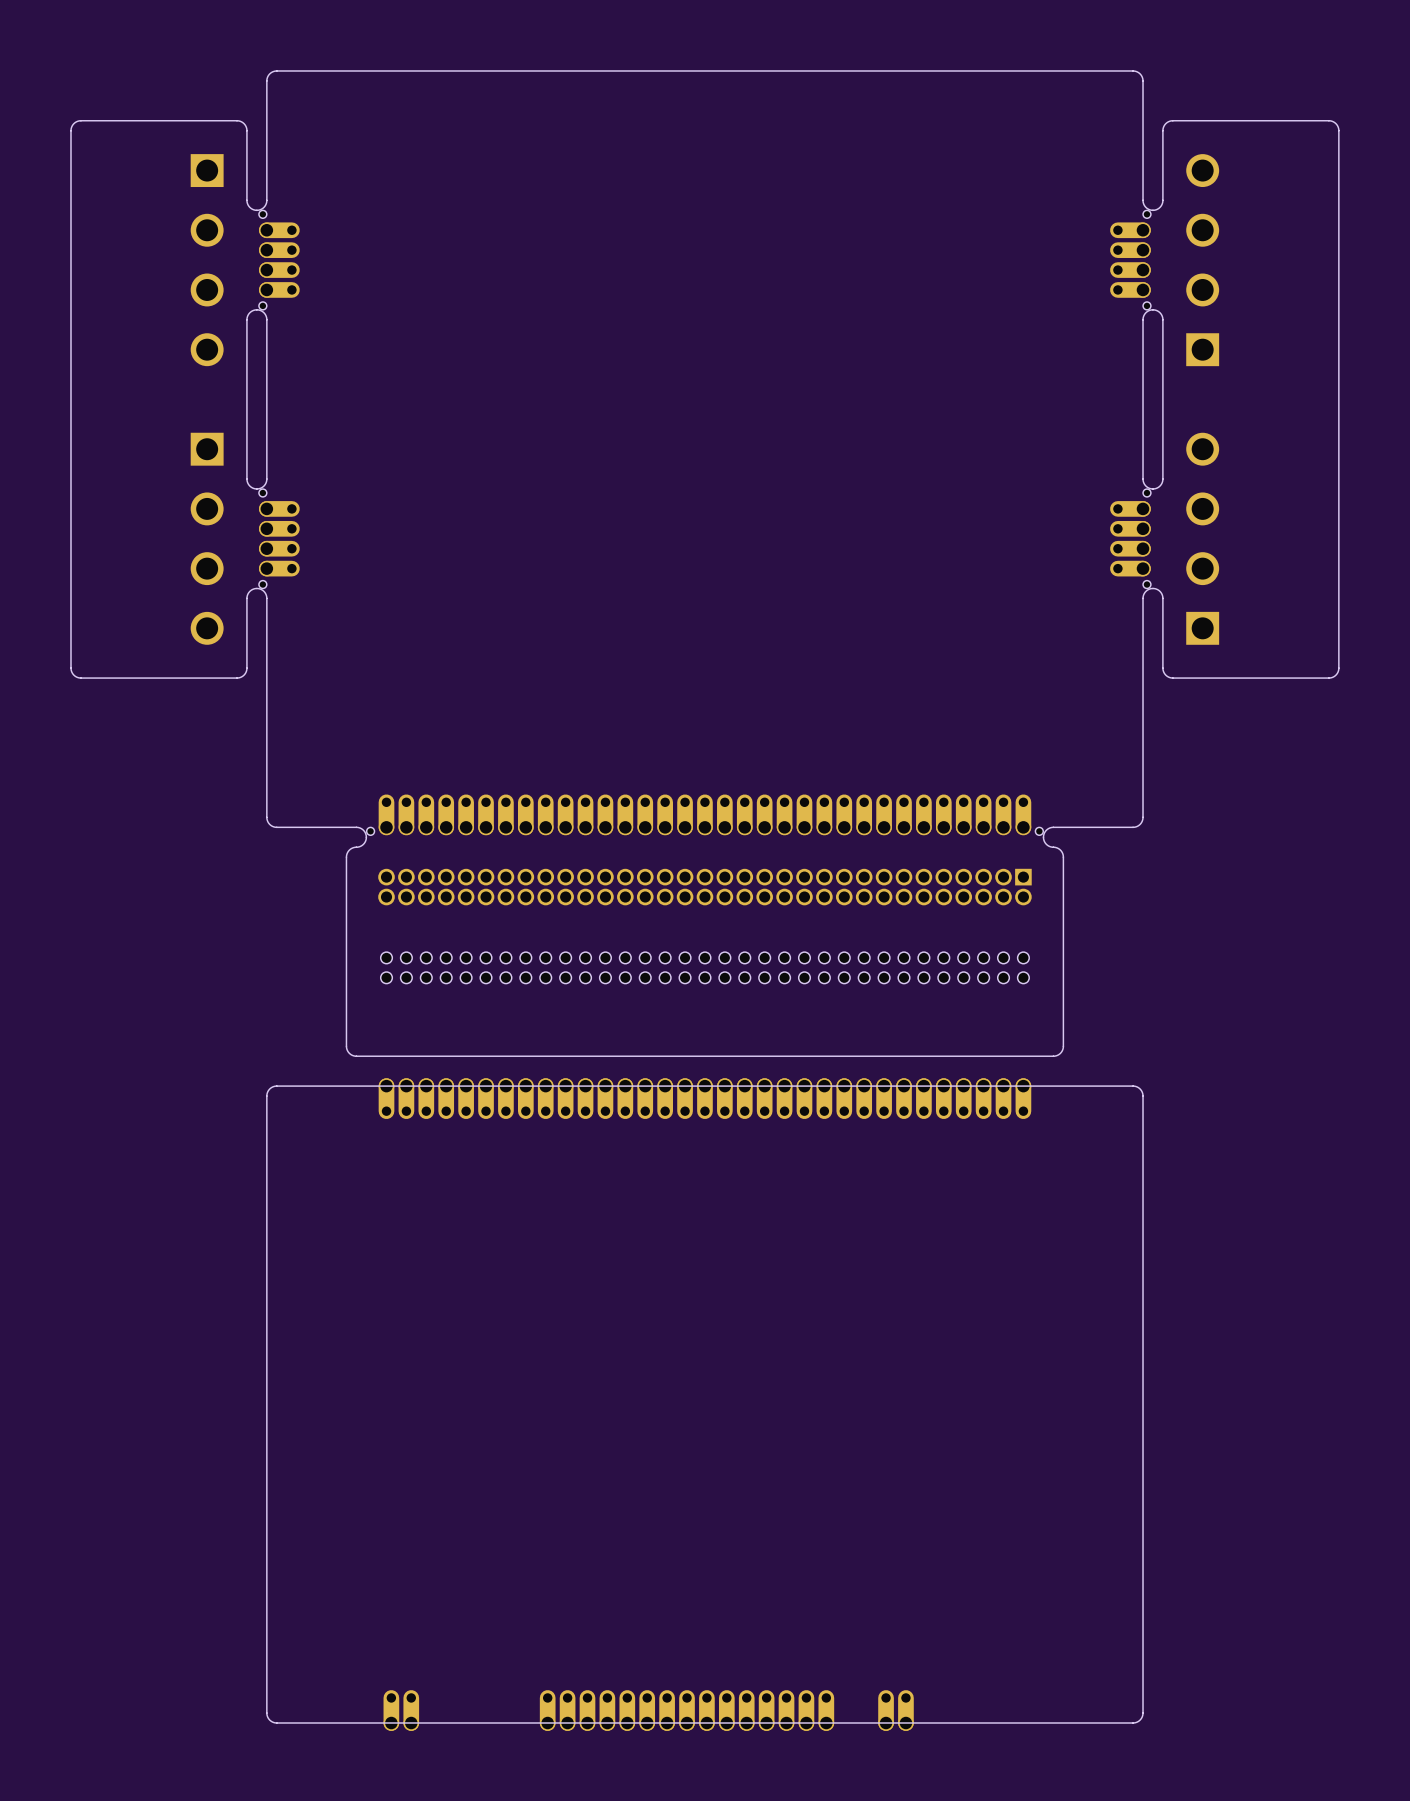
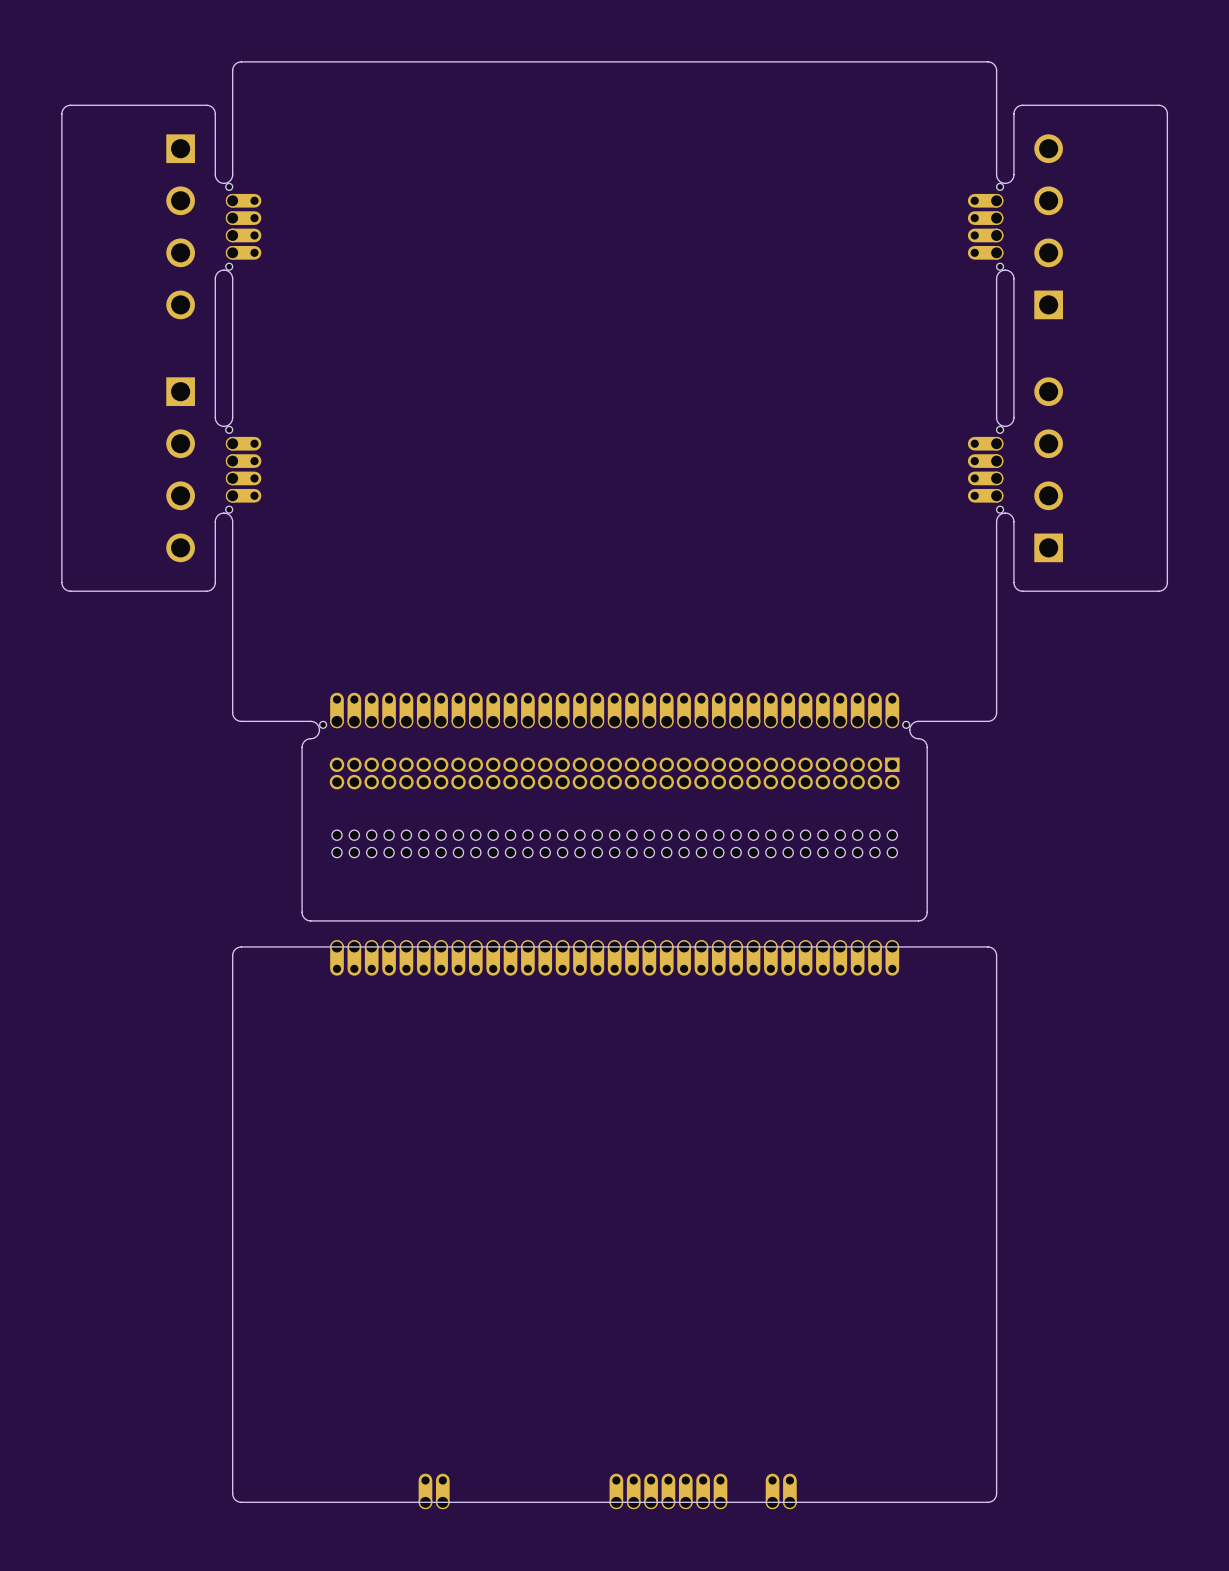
part: (391, 1710) -> none
part: (411, 1710) -> none
part: none -> (425, 1491)
part: none -> (442, 1491)
part: (547, 1710) -> none
part: (567, 1710) -> none
part: (587, 1710) -> none
part: (607, 1710) -> none
part: (627, 1710) -> none
part: (647, 1710) -> none
part: (667, 1710) -> none
part: (687, 1710) -> none

